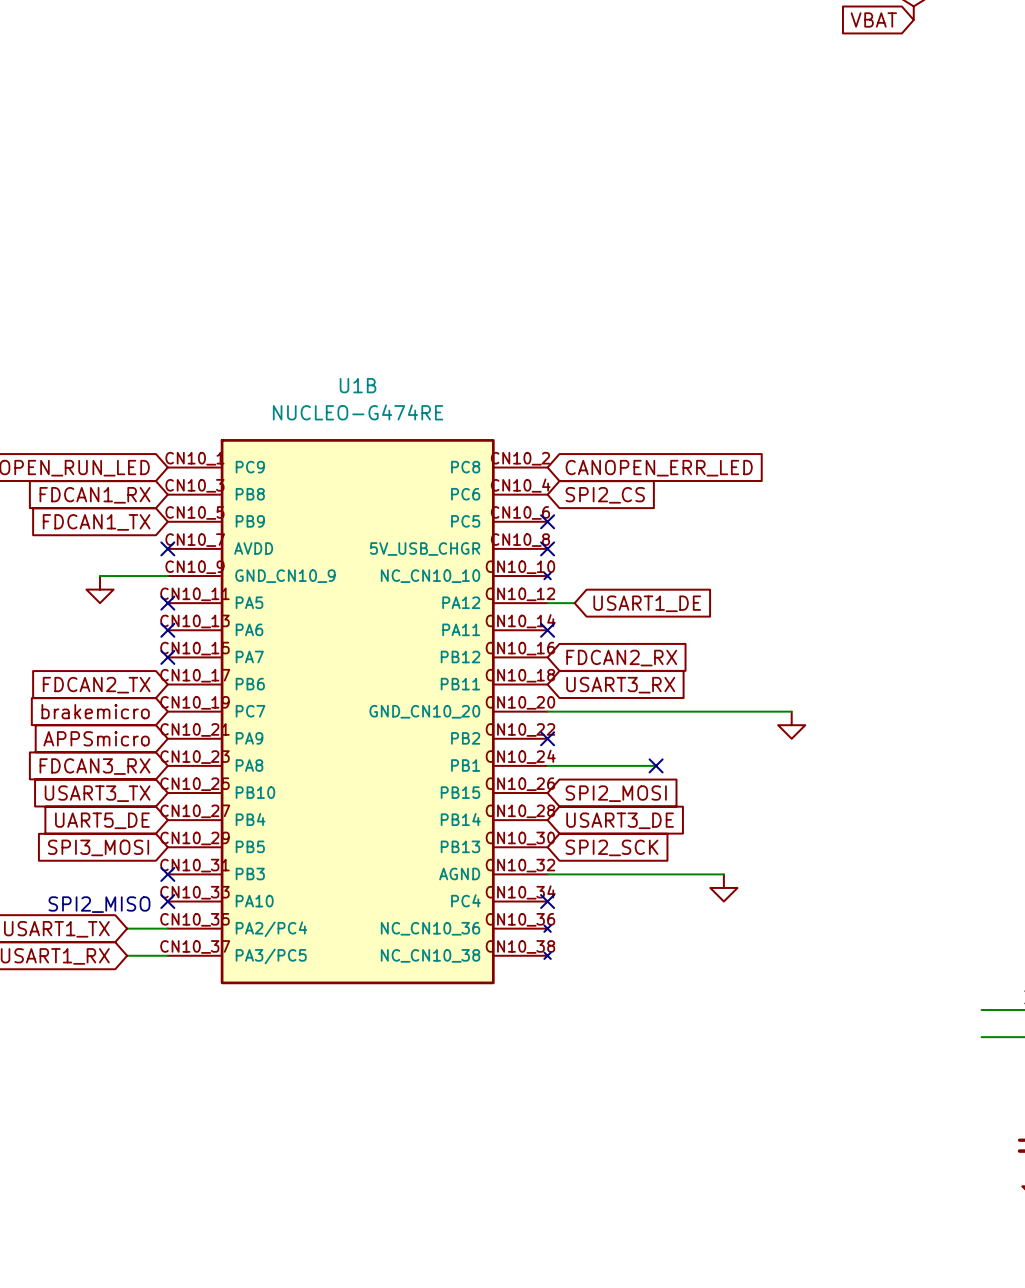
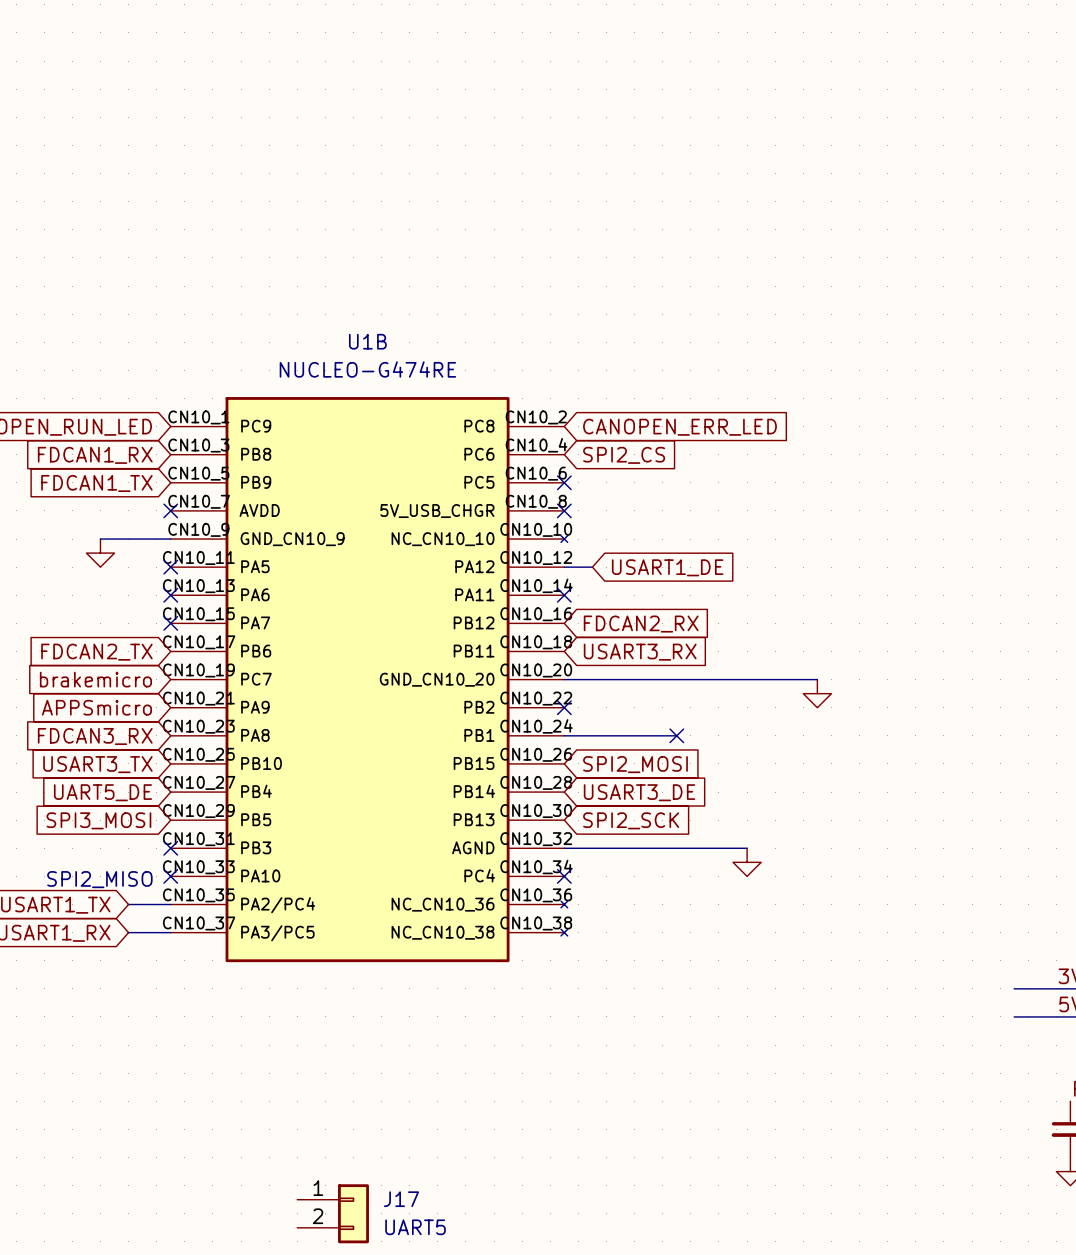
J17: none -> UART5 (333, 1213)

